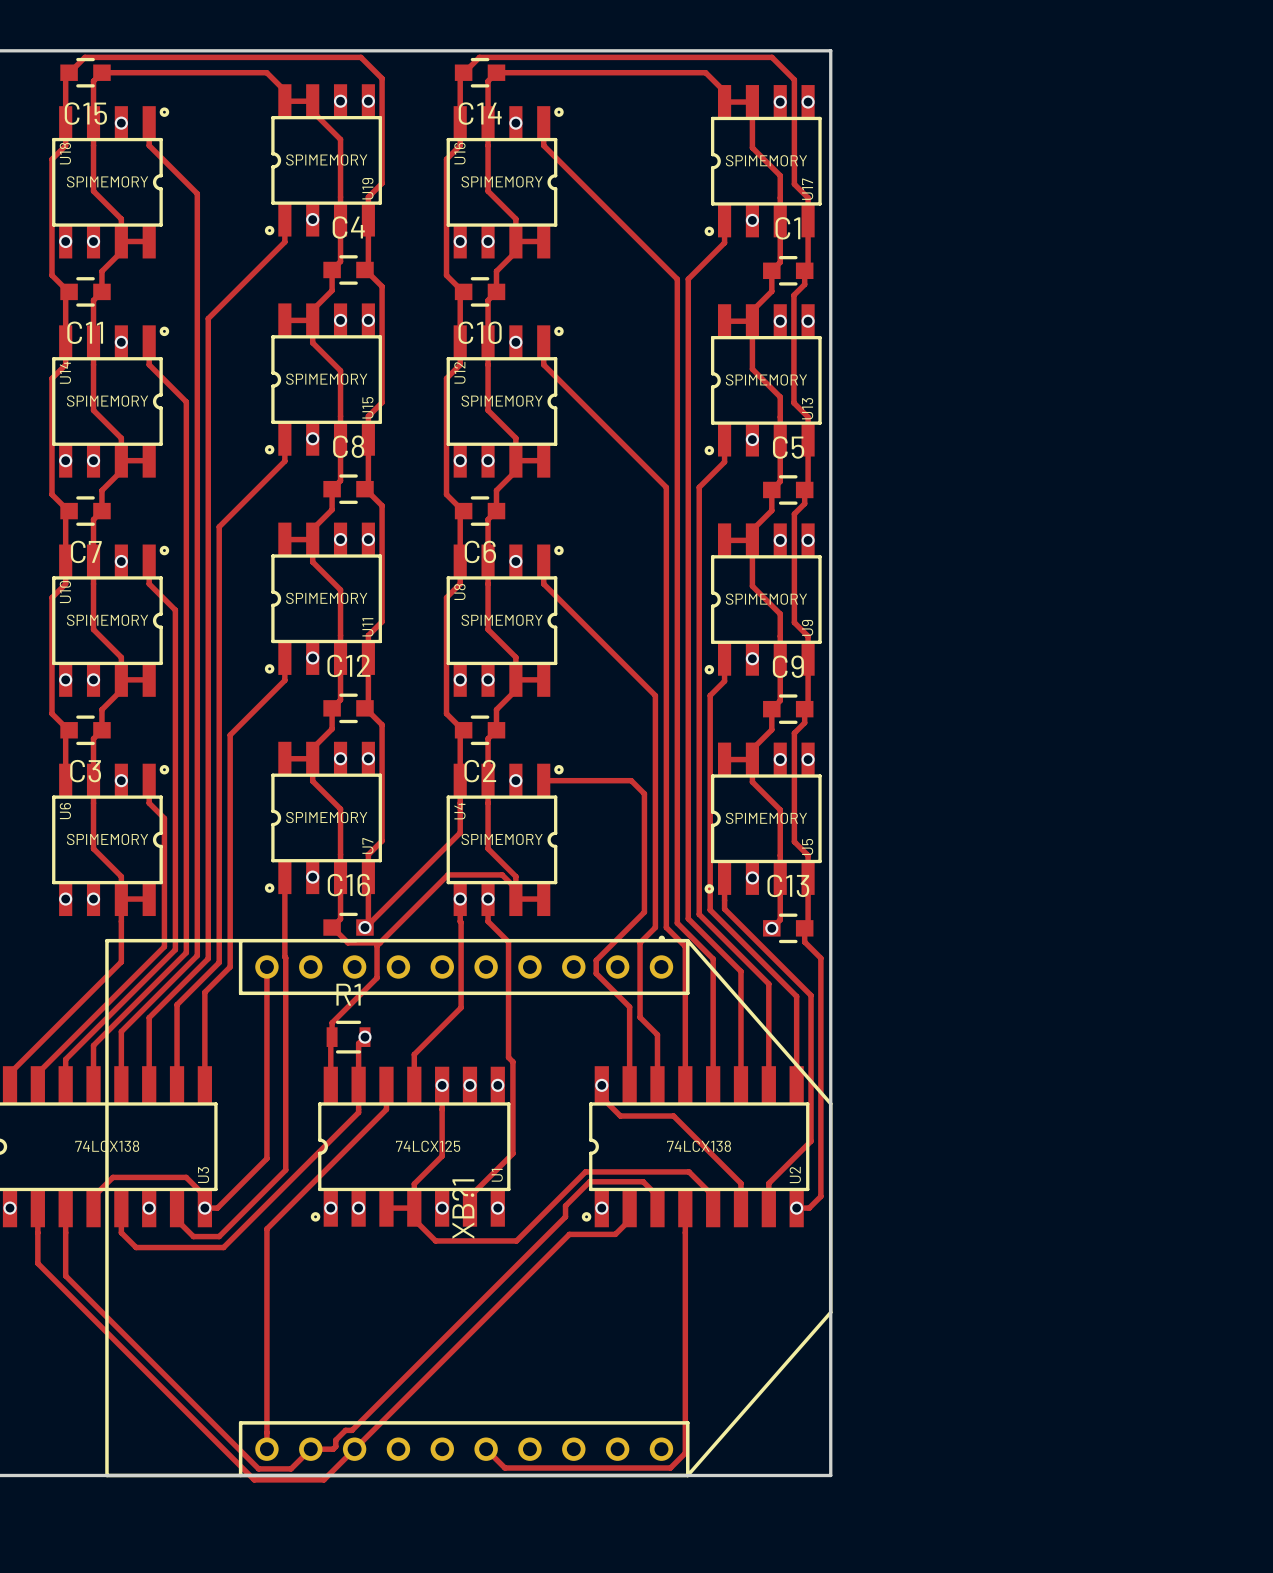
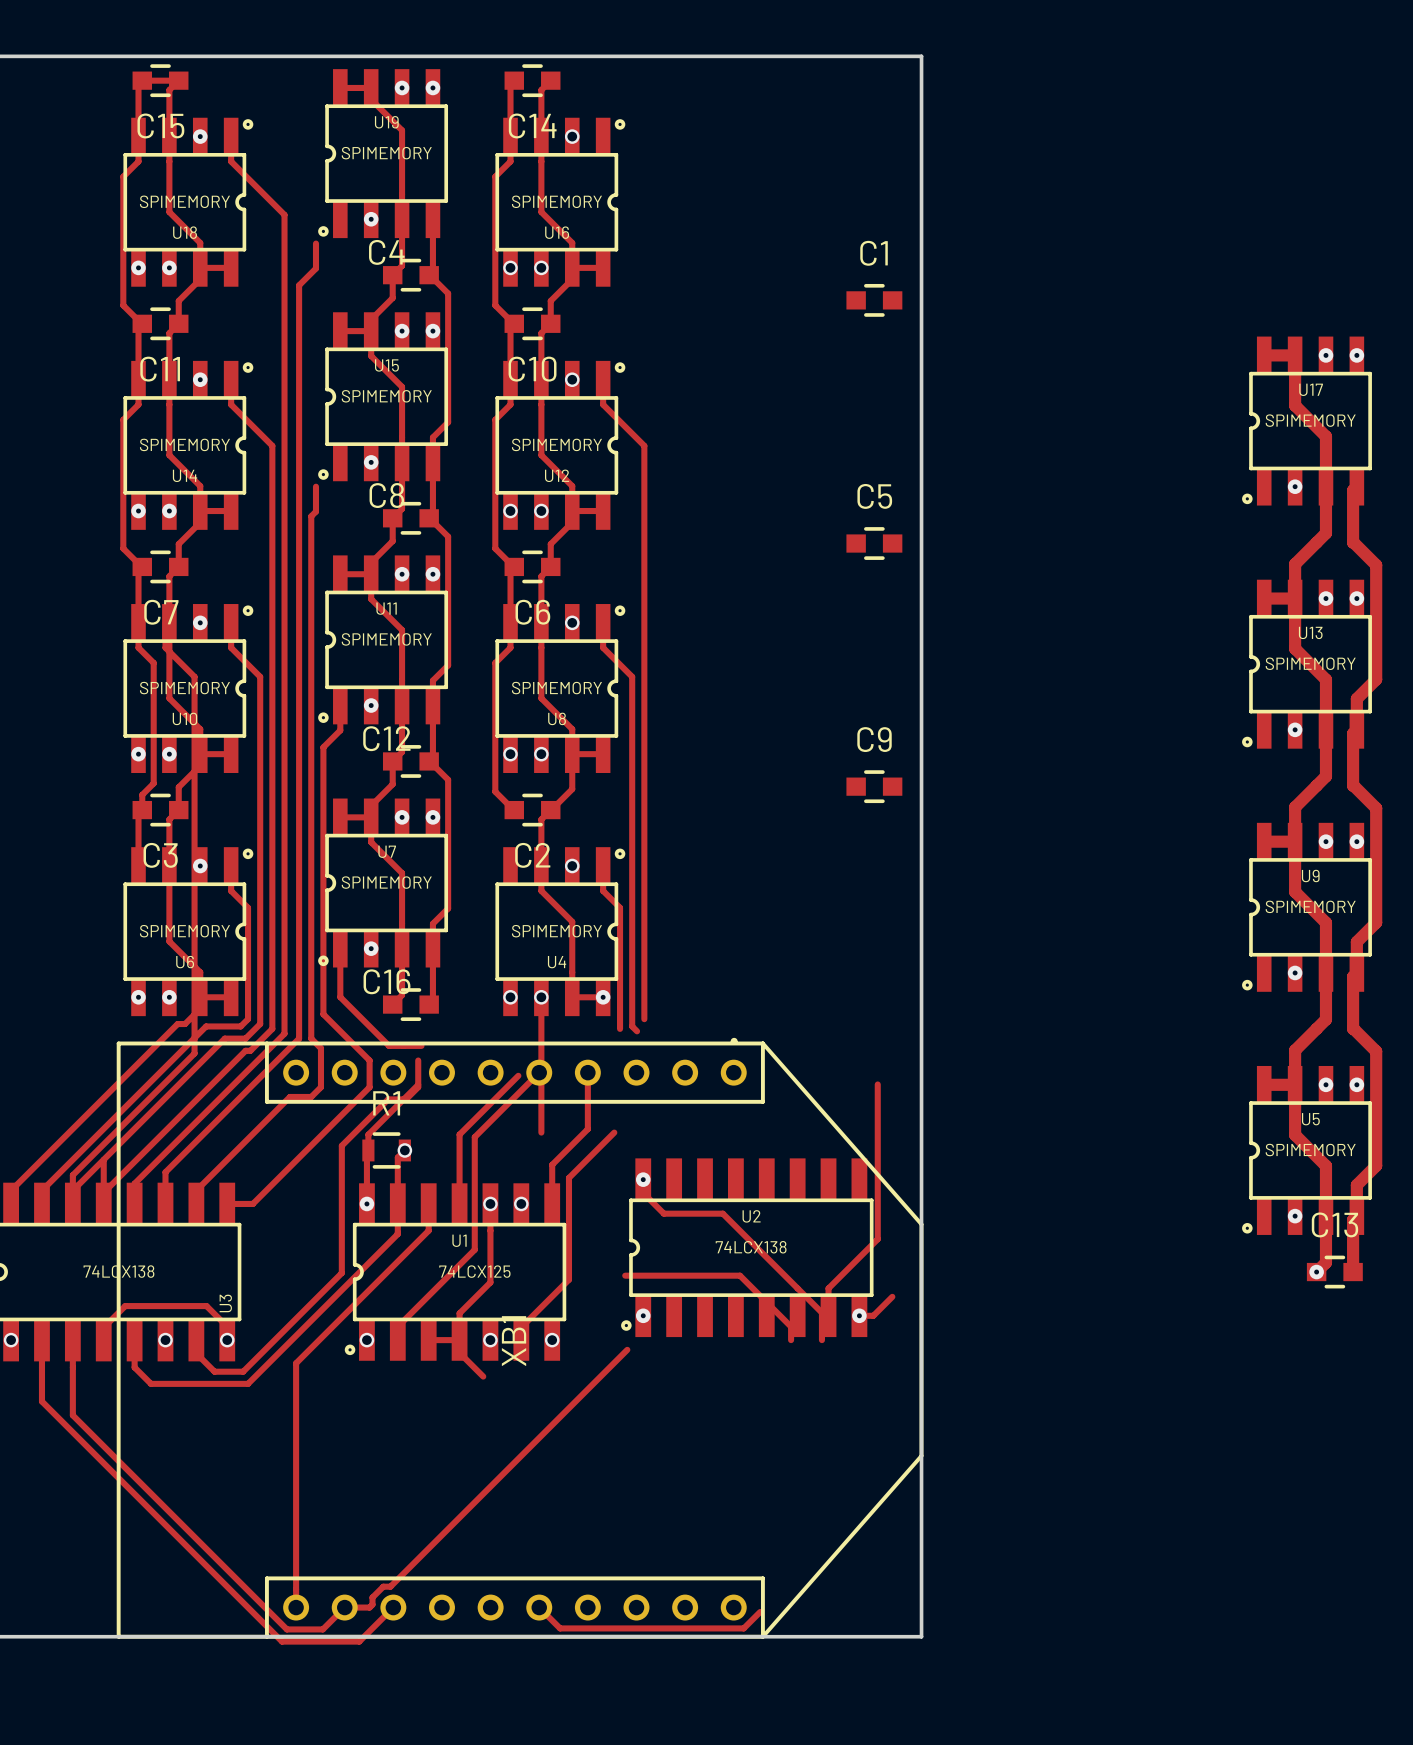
track: none -> (340, 76) (340, 87) (371, 87) (371, 99) (402, 130) (402, 265) (392, 275) (392, 298) (371, 319) (371, 356) (402, 386) (402, 508) (392, 518) (392, 541) (371, 562) (371, 599) (402, 630) (402, 752) (392, 761) (392, 784) (371, 805) (371, 842) (402, 873) (402, 995) (393, 1004)
C15 position: (85, 72) -> (160, 80)
track: (101, 72) (93, 81) (93, 191) (121, 219) (121, 251) (101, 271) (101, 291) (93, 300) (93, 410) (121, 438) (121, 471) (101, 490) (101, 511) (93, 519) (93, 629) (121, 657) (121, 690) (101, 709) (101, 730) (93, 738) (93, 848) (121, 876) (121, 961) -> (178, 80) (169, 90) (169, 212) (200, 242) (200, 279) (178, 300) (178, 323) (169, 333) (169, 455) (200, 486) (200, 522) (178, 544) (178, 566) (169, 576) (169, 698) (200, 729) (200, 765) (178, 787) (178, 810) (169, 819) (169, 941) (200, 972) (200, 1008) (185, 1024) (177, 1024) (134, 1067)
track: (101, 72) (128, 72) -> (138, 865) (138, 813) (142, 810) (142, 794) (153, 783) (153, 662) (138, 647) (138, 570) (142, 566) (123, 548) (123, 419) (138, 404) (138, 327) (142, 323) (123, 305) (123, 176) (138, 161) (138, 84) (142, 80)
track: (161, 72) (266, 72) (284, 90) (284, 101) (312, 101) (312, 111) (340, 139) (340, 261) (332, 269) (332, 290) (312, 309) (312, 342) (340, 370) (340, 480) (332, 489) (332, 509) (312, 529) (312, 562) (340, 589) (340, 699) (332, 708) (332, 728) (312, 748) (312, 781) (340, 809) (340, 919) (332, 927) (347, 942) (350, 942) -> (340, 948) (340, 997) (389, 1045)
track: (464, 72) (479, 57) (771, 57) (794, 79) (794, 184) (808, 197) (808, 267) (804, 270) (804, 284) (793, 295) (793, 402) (808, 417) (808, 486) (804, 489) (804, 503) (794, 513) (794, 622) (808, 636) (808, 705) (804, 709) (804, 722) (794, 733) (794, 841) (808, 855) (808, 924) (804, 928) (804, 942) (820, 958) (820, 1196) (809, 1208) (796, 1208) -> none
track: (496, 72) (705, 72) (724, 91) (724, 102) (752, 102) (752, 147) (780, 175) (780, 262) (771, 270) (771, 291) (752, 310) (752, 369) (780, 397) (780, 481) (771, 489) (771, 510) (752, 529) (752, 586) (780, 614) (780, 700) (771, 709) (771, 729) (752, 749) (752, 782) (780, 809) (780, 919) (771, 928) -> none
via: none -> (402, 87)
via: none -> (432, 87)
via: (340, 101) -> none
via: (368, 101) -> none
via: (780, 102) -> none
via: (808, 102) -> none
via: (121, 123) -> none
track: (149, 123) (149, 145) (197, 193) (197, 955) (121, 1031) (121, 1067) -> (231, 136) (231, 161) (284, 214) (284, 1033) (134, 1183)
via: none -> (200, 136)
track: (543, 123) (543, 145) (677, 279) (677, 923) (713, 958) (713, 1085) -> none
U18 name rotation: 0° (65, 153) -> 90° clockwise (185, 232)
U18 name position: U18 (65, 153) -> U18 (185, 232)
U16 name rotation: 0° (459, 153) -> 90° clockwise (557, 232)
U16 name position: U16 (459, 153) -> U16 (557, 232)
U19 position: (323, 160) -> (383, 153)
U17 position: (763, 161) -> (1307, 421)
U18 position: (110, 182) -> (188, 202)
U19 name rotation: 0° (367, 188) -> 90° clockwise (386, 122)
U19 name position: U19 (367, 188) -> U19 (386, 122)
U17 name rotation: 0° (807, 189) -> 90° clockwise (1311, 389)
U17 name position: U17 (807, 189) -> U17 (1311, 389)
via: none -> (371, 219)
track: none -> (432, 219) (432, 271) (429, 275) (448, 293) (448, 422) (432, 437) (432, 514) (429, 518) (448, 536) (448, 665) (432, 680) (432, 757) (429, 761) (448, 779) (448, 908) (432, 923) (432, 1000) (429, 1004)
via: (312, 219) -> none
track: (724, 220) (724, 242) (688, 279) (688, 918) (740, 971) (740, 1085) -> none
via: (752, 220) -> none
via: (65, 241) -> none
via: (93, 241) -> none
track: (121, 241) (149, 241) -> (200, 267) (231, 267)
via: none -> (138, 267)
via: none -> (169, 267)
track: (269, 257) (208, 318) (208, 958) (149, 1017) (149, 1056) -> (299, 285) (299, 1038) (165, 1172)
C4 position: (348, 269) -> (410, 275)
C11 position: (85, 291) -> (160, 323)
via: none -> (402, 331)
via: none -> (432, 331)
track: (284, 320) (312, 320) -> (340, 331) (371, 331)
via: (340, 320) -> none
via: (368, 320) -> none
track: none -> (1264, 355) (1295, 355) (1295, 405) (1325, 436) (1325, 533) (1295, 564) (1295, 648) (1325, 679) (1325, 776) (1295, 807) (1295, 891) (1325, 922) (1325, 1019) (1295, 1050) (1295, 1135) (1325, 1165) (1325, 1262) (1316, 1272)
via: none -> (1325, 355)
via: none -> (1356, 355)
track: (724, 321) (752, 321) -> (1264, 598) (1295, 598)
via: (780, 321) -> none
via: (808, 321) -> none
via: (121, 342) -> none
track: (149, 342) (149, 364) (186, 401) (186, 952) -> (231, 622) (231, 647) (260, 676) (260, 1024) (245, 1038) (224, 1038) (206, 1056)
via: none -> (200, 379)
track: none -> (231, 379) (231, 404) (272, 445) (272, 1028) (250, 1050) (245, 1050) (103, 1192)
U14 name rotation: 0° (65, 372) -> 90° clockwise (185, 475)
U14 name position: U14 (65, 372) -> U14 (185, 475)
U12 name rotation: 0° (459, 372) -> 90° clockwise (557, 475)
U12 name position: U12 (459, 372) -> U12 (557, 475)
U15 position: (323, 379) -> (383, 396)
U13 position: (763, 380) -> (1307, 664)
U14 position: (110, 401) -> (188, 445)
track: (580, 401) (666, 487) (666, 927) (685, 946) (685, 1085) -> (644, 445) (644, 1019)
U15 name rotation: 0° (367, 407) -> 90° clockwise (386, 365)
U15 name position: U15 (367, 407) -> U15 (386, 365)
U13 name rotation: 0° (807, 408) -> 90° clockwise (1310, 632)
U13 name position: U13 (807, 408) -> U13 (1310, 632)
via: none -> (371, 462)
via: (312, 438) -> none
via: none -> (1295, 486)
track: none -> (1356, 486) (1353, 490) (1353, 542) (1376, 565) (1376, 679) (1356, 698) (1356, 729) (1353, 733) (1353, 785) (1376, 808) (1376, 922) (1356, 941) (1356, 972) (1353, 976) (1353, 1028) (1376, 1051) (1376, 1165) (1356, 1185) (1356, 1216) (1353, 1219) (1353, 1272)
track: (724, 439) (724, 462) (699, 487) (699, 914) (768, 983) (768, 1085) -> none
via: (752, 439) -> none
via: (65, 460) -> none
via: (93, 460) -> none
track: (121, 460) (149, 460) -> (200, 511) (231, 511)
via: none -> (138, 511)
via: none -> (169, 511)
track: (280, 465) (219, 526) (219, 962) (177, 1004) (177, 1073) -> (311, 516) (311, 1038) (320, 1048) (320, 1087) (311, 1096) (289, 1096) (196, 1190)
C8 position: (348, 489) -> (410, 518)
C7 position: (85, 511) -> (160, 566)
via: none -> (402, 574)
via: none -> (432, 574)
track: (284, 539) (312, 539) -> (340, 574) (371, 574)
via: (340, 539) -> none
via: (368, 539) -> none
via: none -> (1325, 598)
via: none -> (1356, 598)
track: (724, 540) (752, 540) -> (1264, 841) (1295, 841)
via: (780, 540) -> none
via: (808, 540) -> none
via: (121, 561) -> none
via: none -> (200, 622)
U8 name rotation: 0° (459, 591) -> 90° clockwise (557, 718)
U8 name position: U8 (459, 591) -> U8 (557, 718)
U10 name rotation: 0° (65, 592) -> 90° clockwise (184, 718)
U10 name position: U10 (65, 592) -> U10 (184, 718)
U11 position: (323, 598) -> (383, 639)
U9 position: (763, 599) -> (1307, 907)
track: (569, 610) (655, 695) (655, 927) (640, 942) (640, 1017) (657, 1034) (657, 1085) -> (632, 676) (632, 1026) (637, 1031)
U10 position: (110, 620) -> (188, 688)
U11 name rotation: 0° (367, 627) -> 90° clockwise (386, 608)
U11 name position: U11 (367, 627) -> U11 (386, 608)
U9 name rotation: 0° (807, 627) -> 90° clockwise (1310, 876)
U9 name position: U9 (807, 627) -> U9 (1310, 876)
via: none -> (371, 705)
track: (284, 657) (284, 680) (230, 735) (230, 966) (204, 992) (204, 1085) -> (340, 705) (340, 730) (323, 747) (323, 1014) (369, 1060) (369, 1087) (252, 1203) (227, 1203)
via: (312, 657) -> none
via: none -> (1295, 729)
track: (724, 658) (724, 681) (710, 695) (710, 910) (796, 996) (796, 1085) -> none
via: (752, 658) -> none
via: (65, 679) -> none
via: (93, 679) -> none
track: (121, 679) (149, 679) -> (200, 754) (231, 754)
via: none -> (138, 754)
via: none -> (169, 754)
track: (515, 690) (496, 709) (496, 730) -> (572, 765) (572, 789) (550, 810)
C12 position: (348, 708) -> (410, 761)
C3 position: (85, 730) -> (160, 810)
track: (460, 733) (460, 832) (364, 927) (368, 924) (368, 854) (382, 840) (382, 724) (364, 708) (368, 704) (368, 635) (382, 621) (382, 505) (364, 489) (368, 485) (368, 416) (382, 402) (382, 286) (364, 269) (368, 266) (368, 197) (382, 183) (382, 78) (360, 57) (84, 57) (65, 76) (65, 145) (51, 159) (51, 275) (69, 291) (65, 295) (65, 364) (51, 378) (51, 494) (69, 511) (65, 514) (65, 583) (51, 597) (51, 713) (69, 730) (65, 733) (65, 780) -> none
via: none -> (402, 817)
via: none -> (432, 817)
track: (284, 758) (312, 758) -> (340, 817) (371, 817)
via: (340, 758) -> none
via: (368, 758) -> none
via: none -> (1325, 841)
via: none -> (1356, 841)
track: (724, 759) (752, 759) -> (1264, 1084) (1295, 1084)
via: (780, 759) -> none
via: (808, 759) -> none
via: (121, 780) -> none
track: (149, 780) (149, 803) (164, 818) (164, 946) -> (231, 865) (231, 890) (248, 907) (248, 1019) (240, 1026) (206, 1026) (182, 1050)
via: none -> (200, 865)
track: (543, 780) (631, 780) (644, 793) (644, 912) (596, 960) (596, 973) (629, 1006) (629, 1085) -> (603, 865) (603, 890) (620, 907) (620, 1028)
track: (488, 803) (488, 848) (515, 876) -> (541, 890) (572, 921) (572, 972)
U6 name rotation: 0° (65, 811) -> 90° clockwise (185, 962)
U6 name position: U6 (65, 811) -> U6 (185, 962)
U4 name rotation: 0° (459, 811) -> 90° clockwise (557, 962)
U4 name position: U4 (459, 811) -> U4 (557, 962)
U7 position: (323, 817) -> (383, 883)
U5 position: (763, 818) -> (1307, 1150)
U6 position: (110, 839) -> (188, 931)
U7 name rotation: 0° (367, 845) -> 90° clockwise (387, 851)
U7 name position: U7 (367, 845) -> U7 (387, 851)
U5 name rotation: 0° (807, 846) -> 90° clockwise (1310, 1119)
U5 name position: U5 (807, 846) -> U5 (1310, 1119)
via: none -> (371, 948)
track: (284, 877) (285, 1170) -> (418, 1084) (418, 1087) (406, 1099) (388, 1099) (341, 1145) (341, 1273) (316, 1297)
via: (312, 877) -> none
track: (724, 877) (724, 909) (811, 995) (811, 1141) (768, 1183) (768, 1208) -> none
via: (752, 877) -> none
via: none -> (1295, 972)
track: (515, 888) (502, 874) (447, 874) (377, 945) (377, 956) -> none
via: (65, 899) -> none
via: (93, 899) -> none
track: (121, 899) (149, 899) -> (200, 997) (231, 997)
via: none -> (138, 997)
via: none -> (169, 997)
track: (460, 899) (461, 1007) (414, 1054) -> (518, 1075) (459, 1134) (459, 1169)
via: none -> (603, 997)
track: (488, 921) (508, 942) (508, 1057) (512, 1061) -> (541, 1022) (541, 1132)
C16 position: (348, 927) -> (410, 1004)
via: (364, 927) -> none
via: (771, 928) -> none
C13 position: (788, 928) -> (1334, 1272)
track: (266, 966) (266, 1158) (217, 1208) (204, 1208) -> none
track: none -> (539, 1072) (474, 1137) (474, 1249) (397, 1326) (397, 1340)
track: none -> (587, 1072) (587, 1129) (552, 1164) (552, 1203)
track: none -> (877, 1084) (877, 1239) (828, 1288) (828, 1315)
via: none -> (1325, 1084)
via: none -> (1356, 1084)
track: none -> (614, 1132) (568, 1177)
via: none -> (643, 1179)
via: none -> (366, 1203)
via: (497, 1085) -> none
track: (601, 1085) (601, 1097) (620, 1116) (673, 1116) -> (643, 1179) (643, 1193) (663, 1213) (722, 1213) (747, 1237)
via: (601, 1085) -> none
via: none -> (1295, 1216)
U2 position: (695, 1146) -> (747, 1247)
via: none -> (1316, 1272)
track: none -> (892, 1296) (873, 1315) (859, 1315)
track: (689, 1171) (585, 1171) (516, 1240) (435, 1240) -> (764, 1299) (740, 1275) (625, 1275)
U2 name rotation: 0° (795, 1174) -> 90° clockwise (751, 1216)
U2 name position: U2 (795, 1174) -> U2 (751, 1216)
U1 name rotation: 0° (497, 1175) -> 90° clockwise (459, 1240)
U1 name position: U1 (497, 1175) -> U1 (459, 1240)
via: none -> (643, 1315)
via: none -> (859, 1315)
via: (358, 1208) -> none
XB?1 name: XB?1 (463, 1208) -> XB1 (514, 1341)
via: (601, 1208) -> none
track: (629, 1208) (629, 1220) (615, 1234) (569, 1234) (354, 1449) -> none
track: (657, 1208) (657, 1196) (643, 1181) (589, 1181) (565, 1205) (565, 1216) -> none
track: (685, 1208) (685, 1453) -> none
via: (796, 1208) -> none

